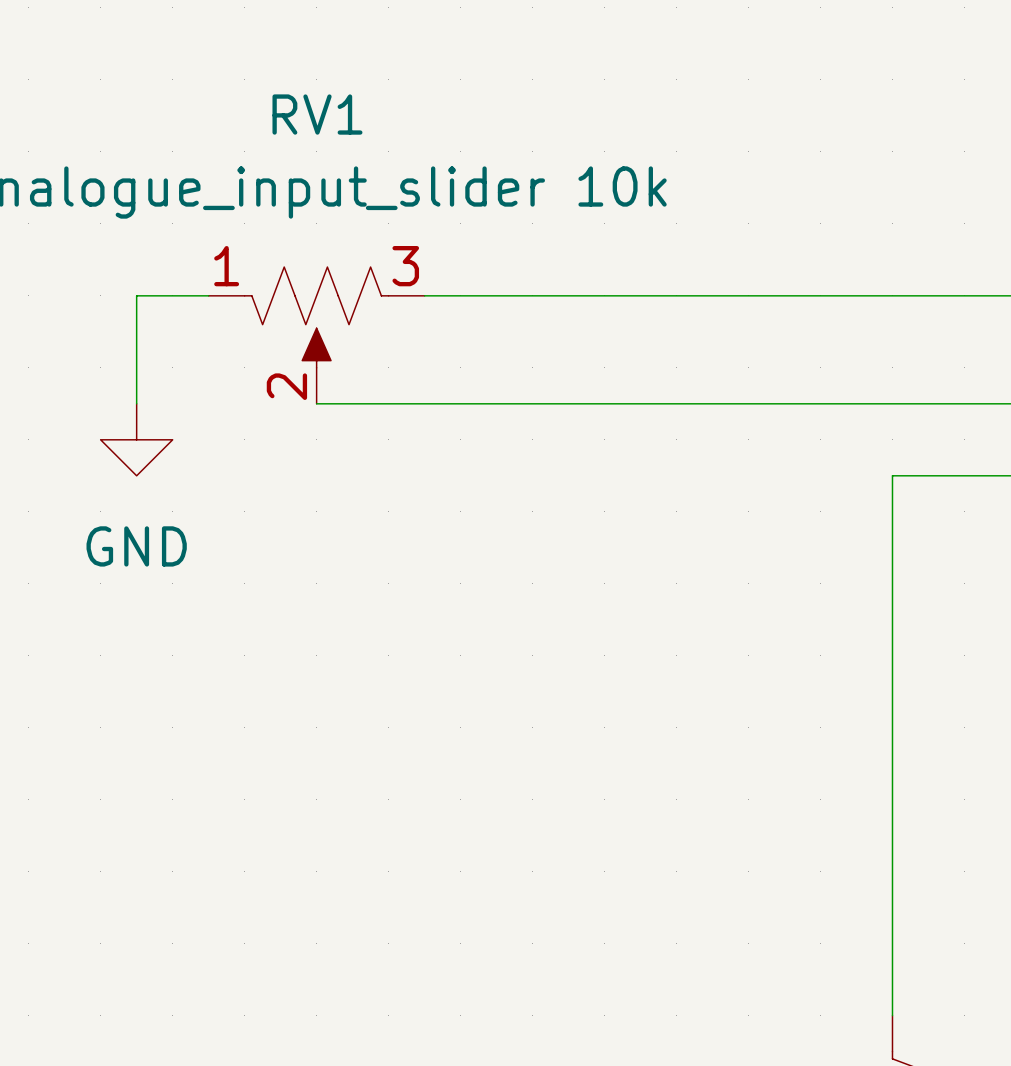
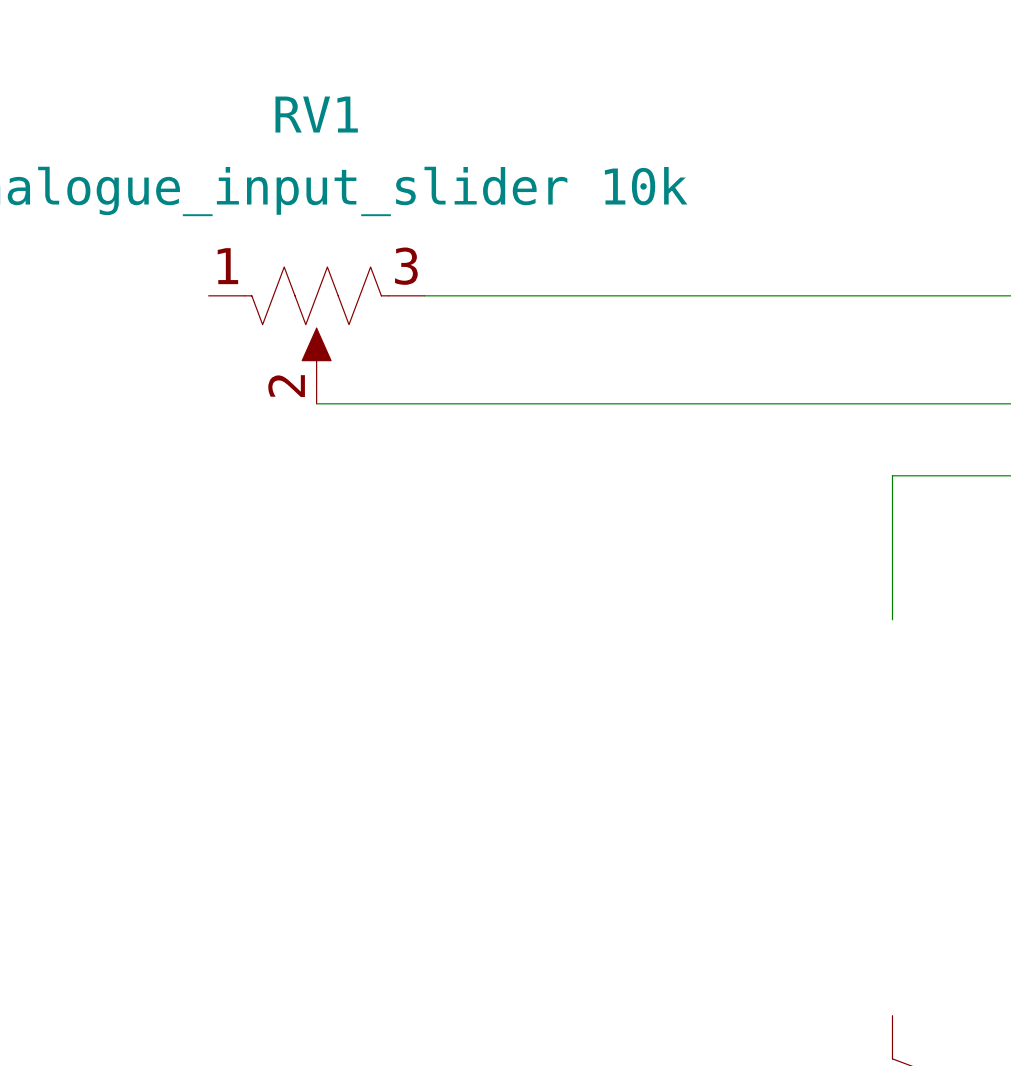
wire: (208, 295) (136, 295) (136, 403) -> none
power symbol: GND (136, 439) -> none
wire: (892, 619) (892, 1015) -> none

